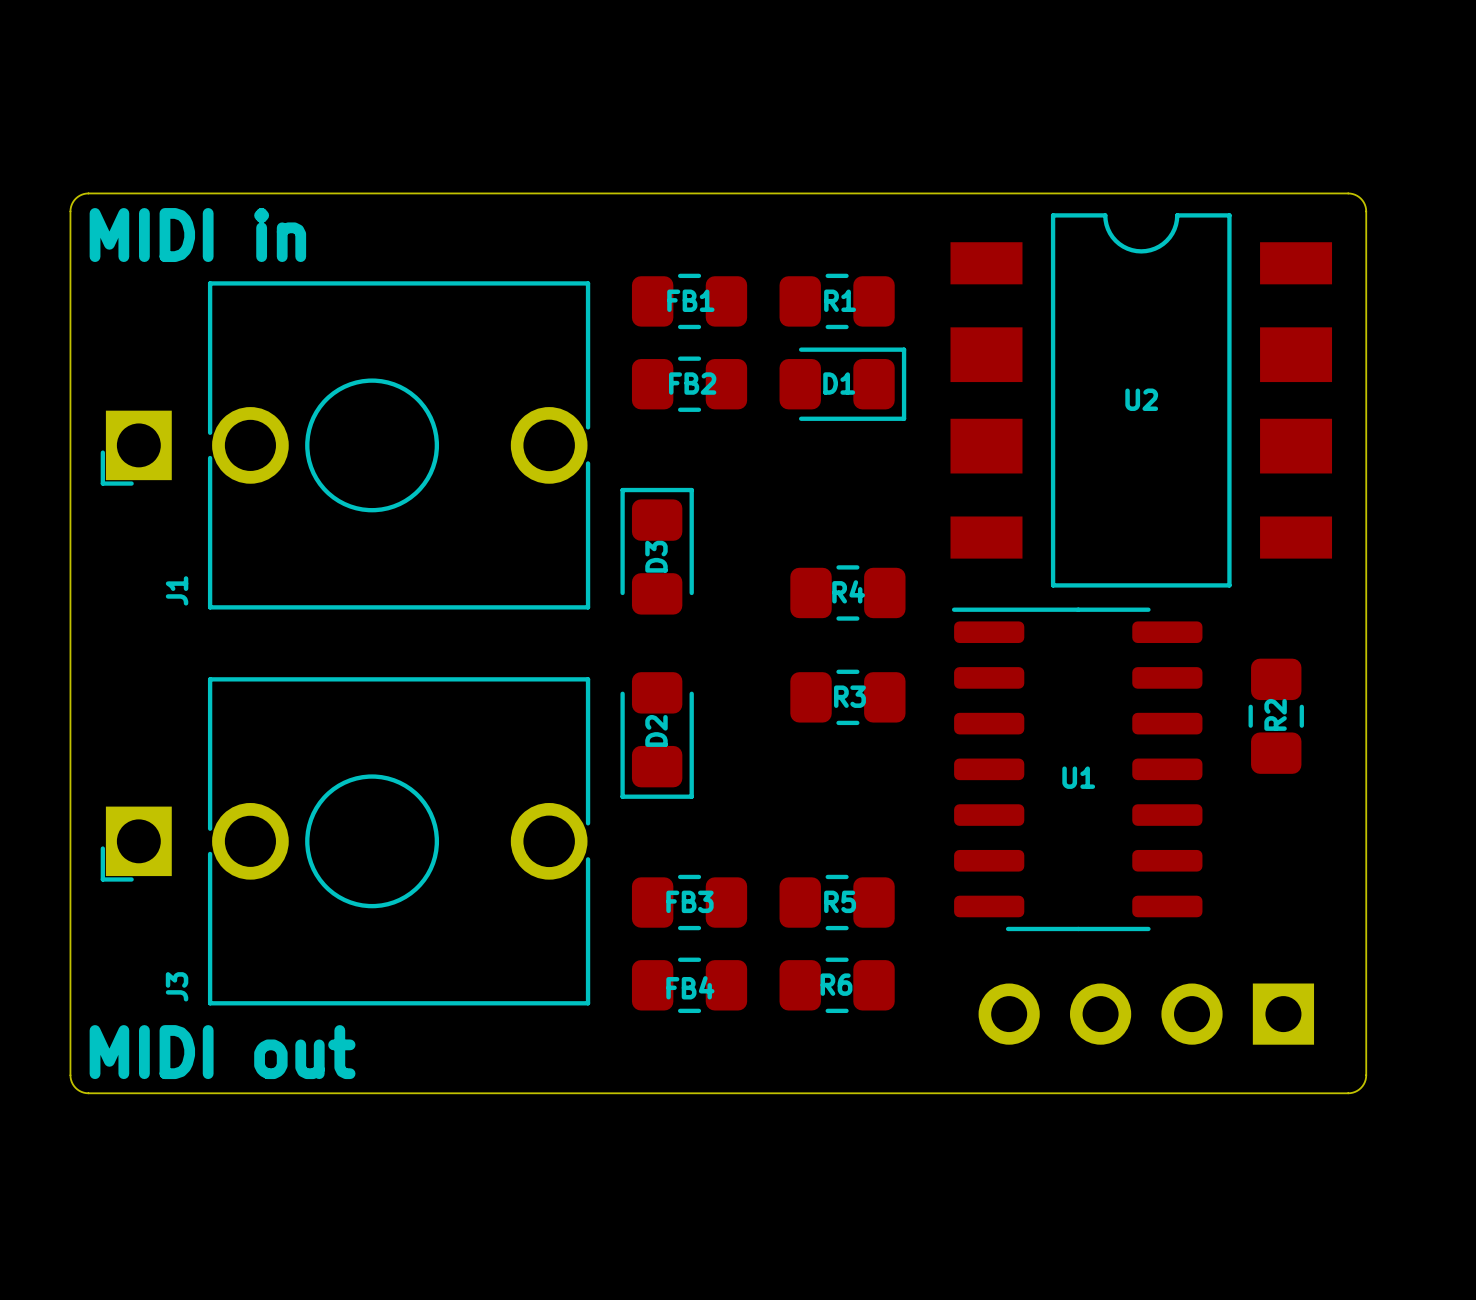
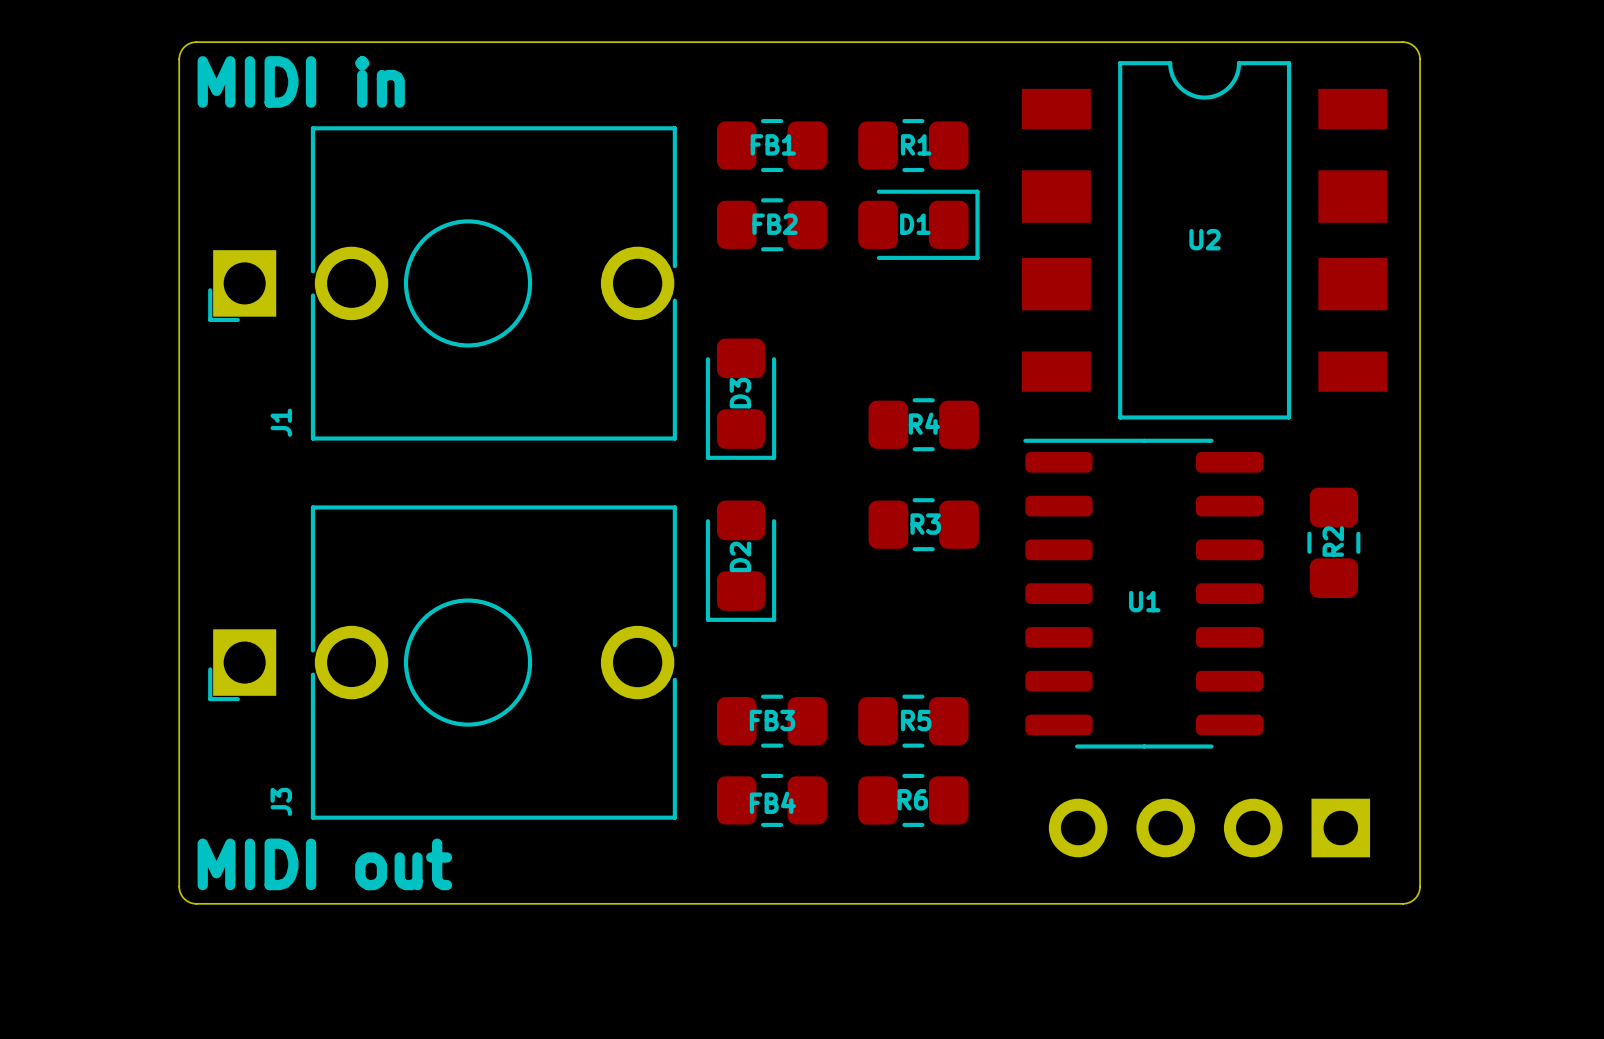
D3 rotation: 0° (657, 551) -> 180° (741, 399)

